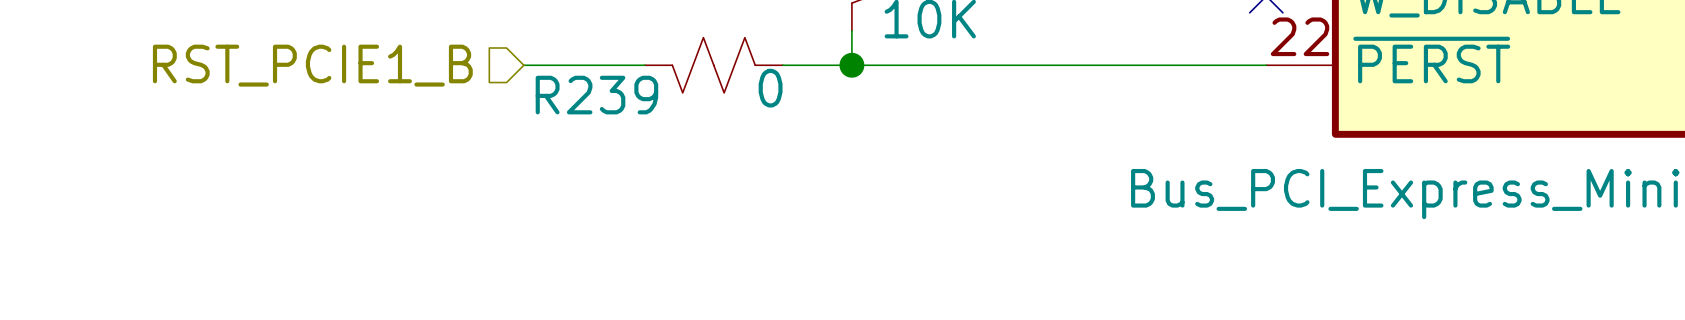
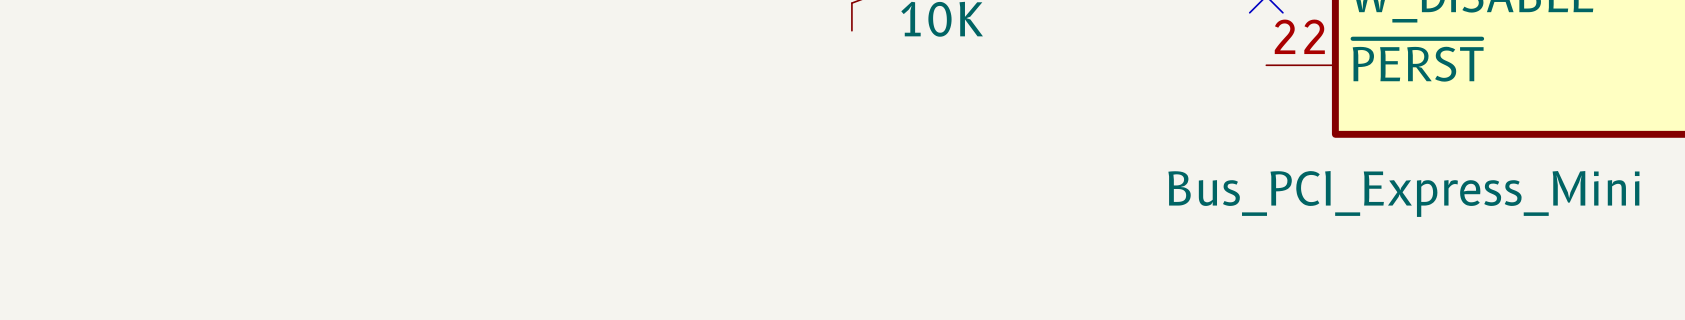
wire: (851, 30) (851, 65) -> none
hierarchical label: RST_PCIE1_B (312, 65) -> none
wire: (523, 65) (644, 65) -> none
R239: 0 (713, 65) -> none
wire: (782, 65) (1266, 65) -> none
junction: (851, 65) -> none

